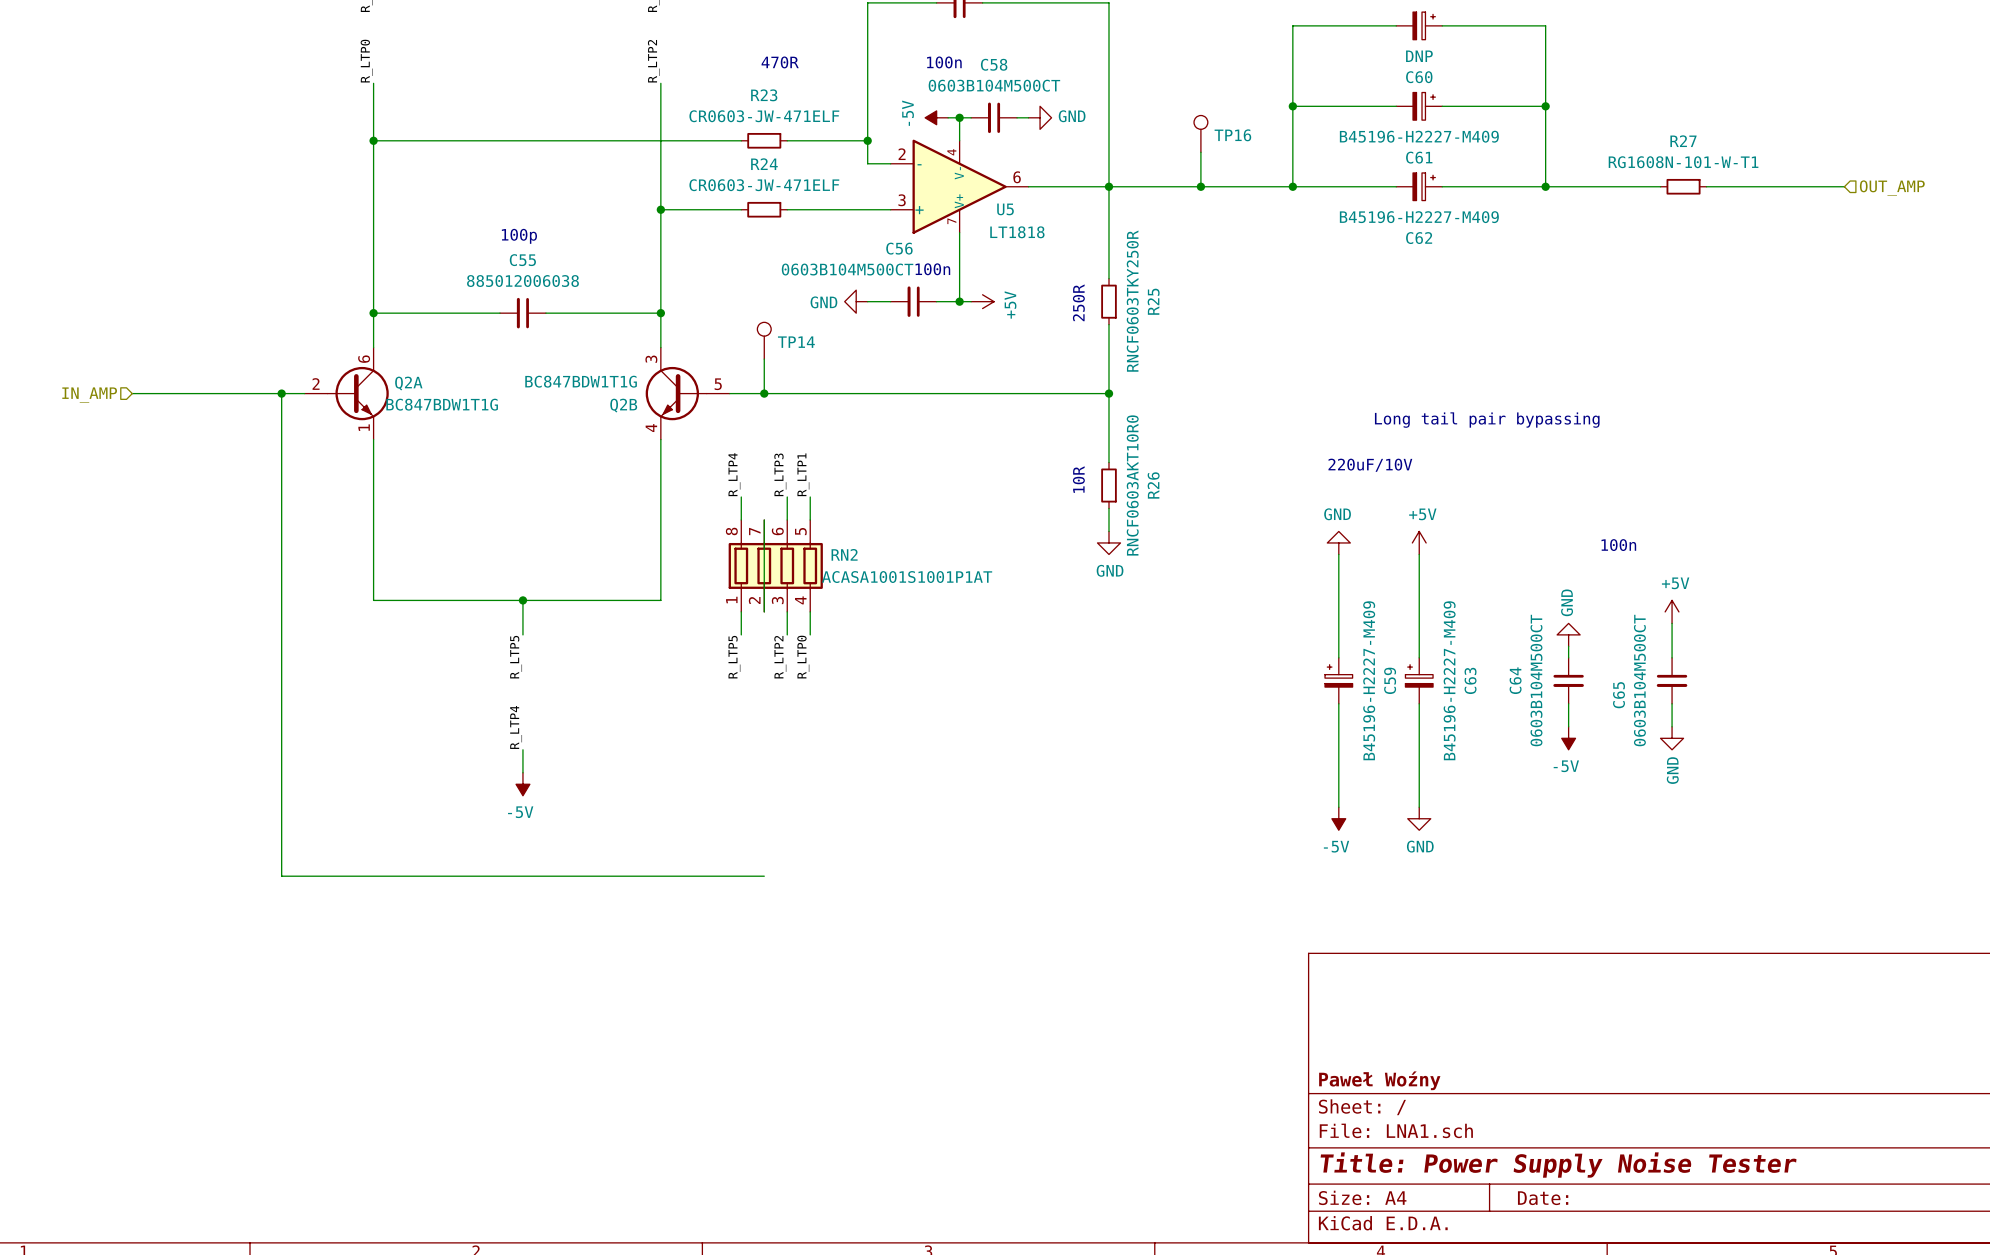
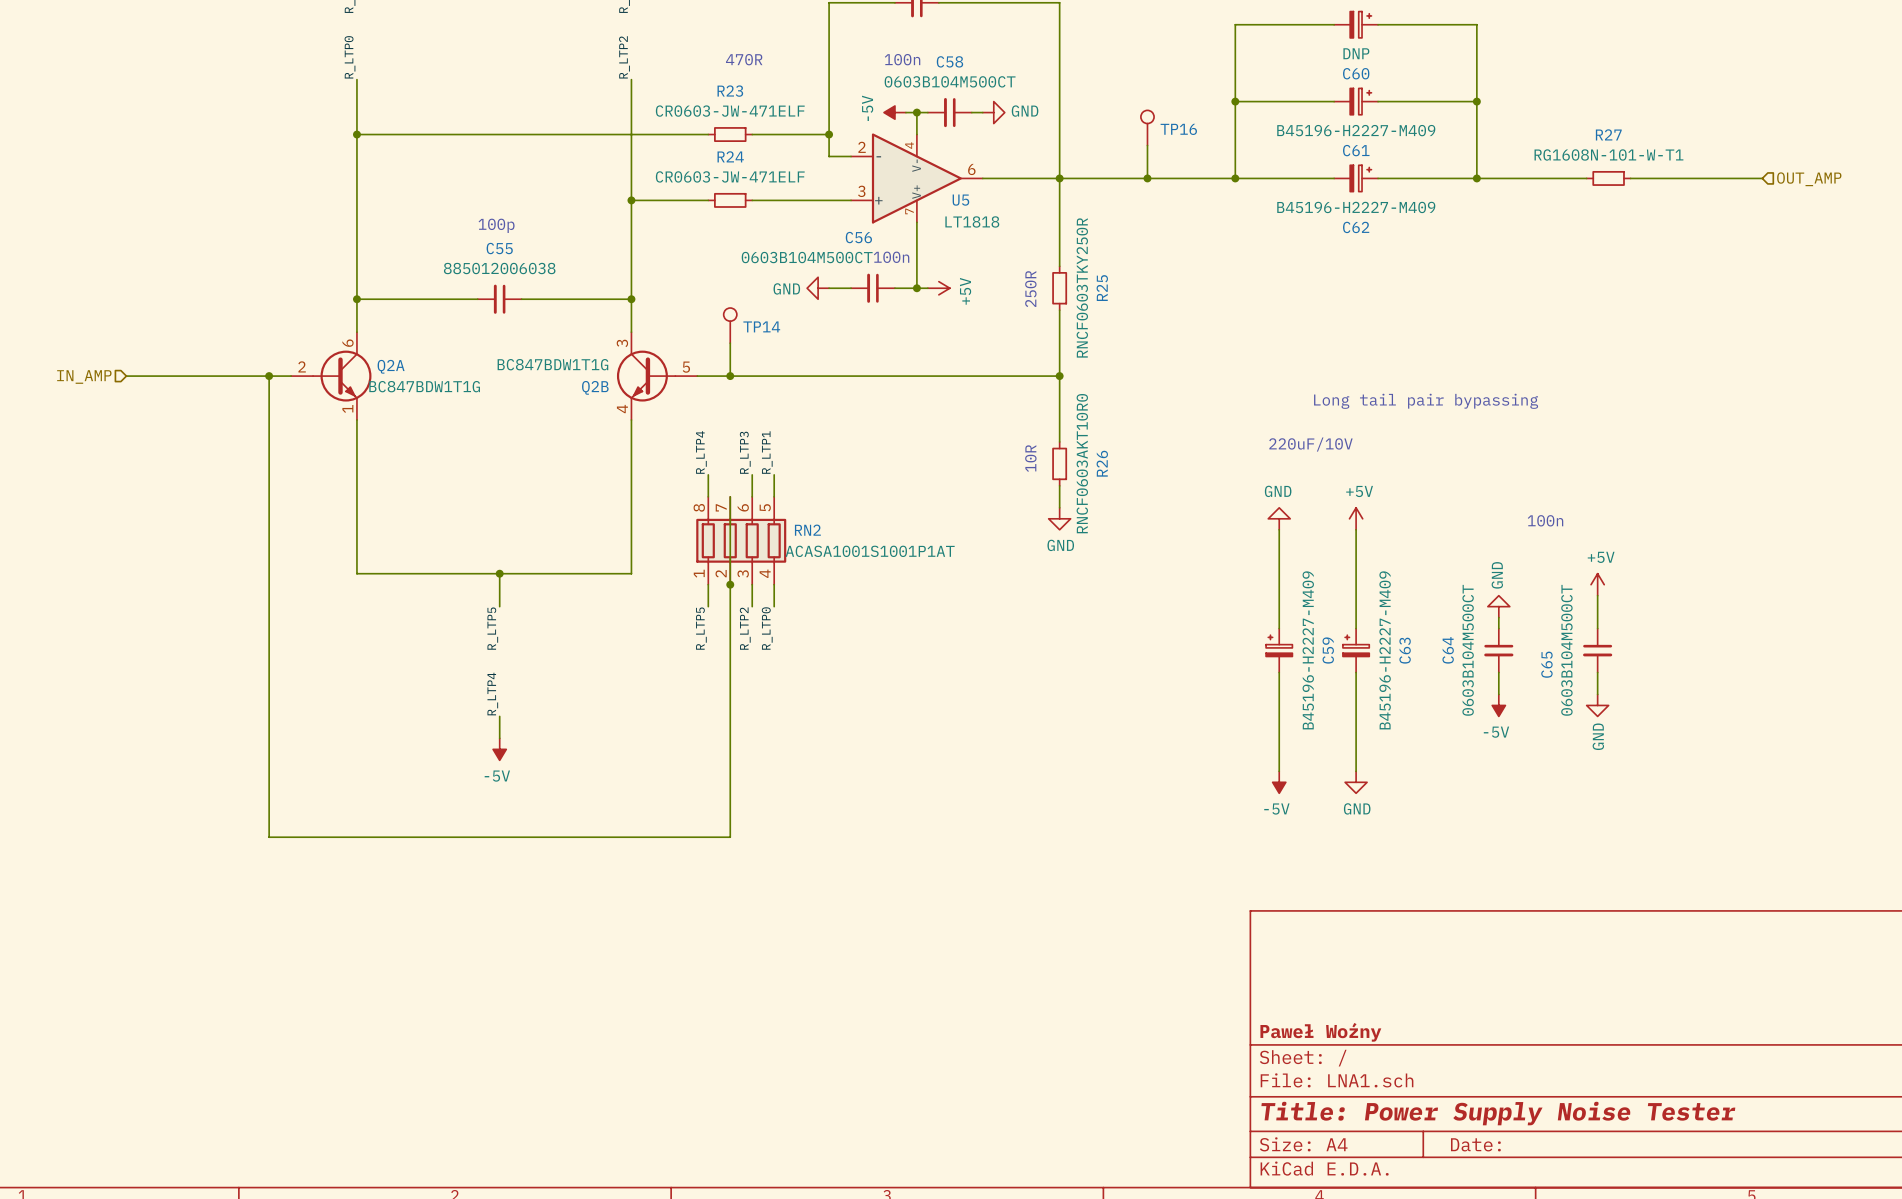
wire: none -> (730, 584) (730, 837)
junction: none -> (730, 584)

